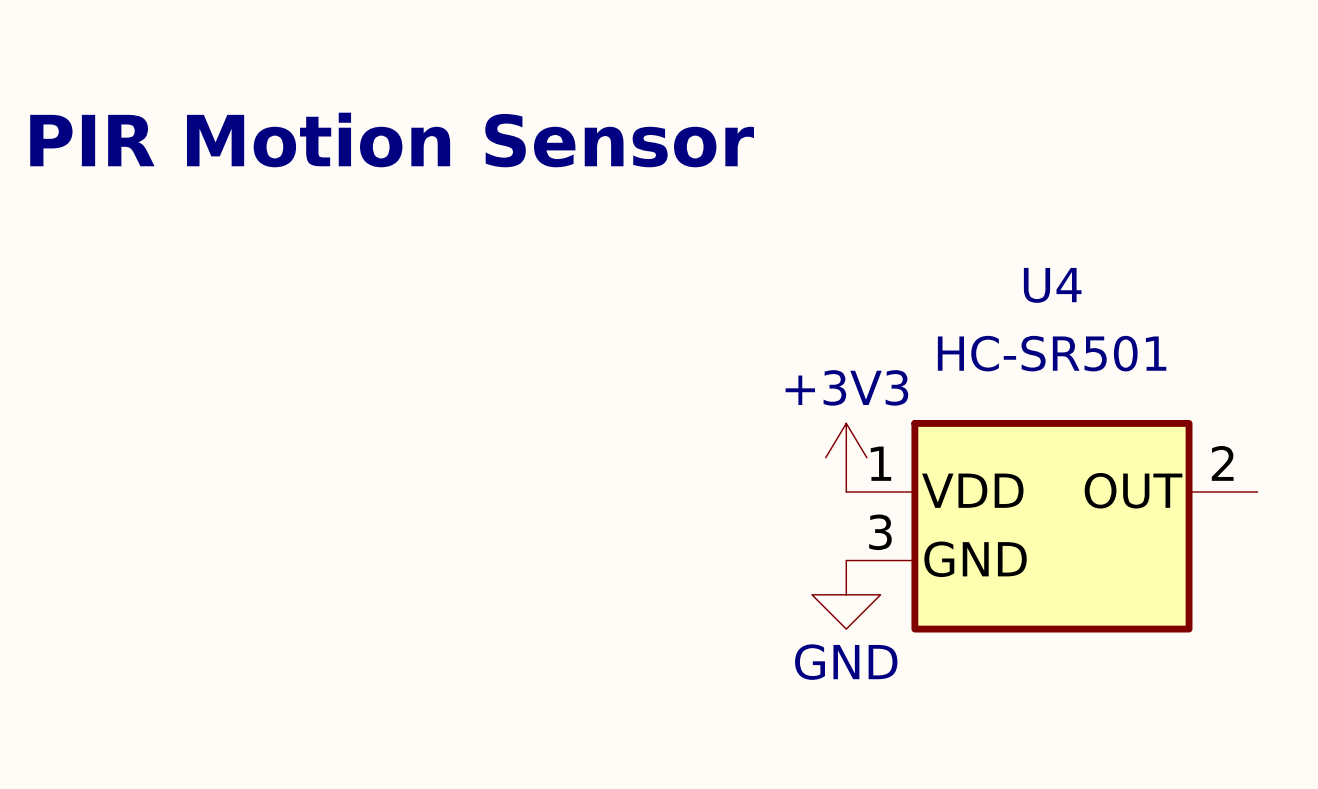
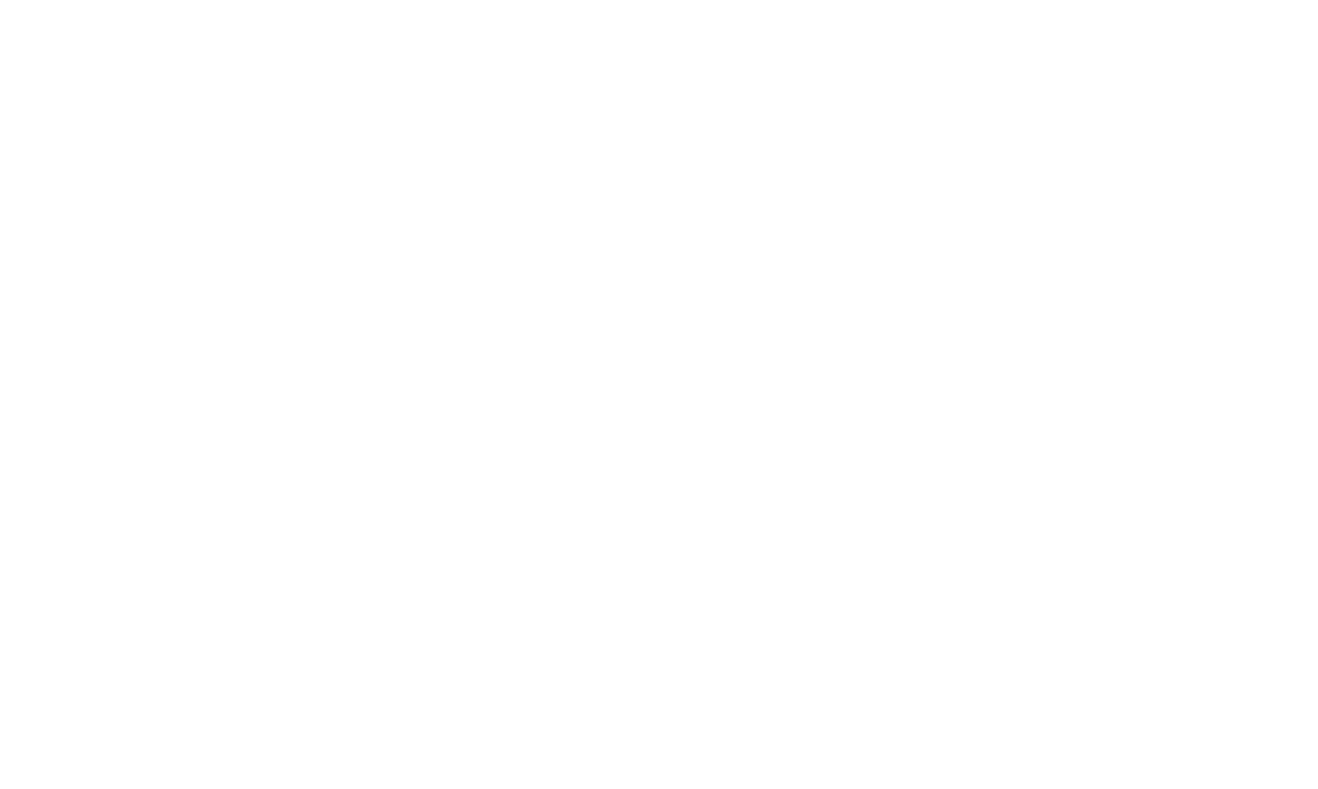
text: PIR Motion Sensor (392, 139) -> none
power symbol: +3V3 (846, 457) -> none
U4: HC-SR501 (1051, 526) -> none
power symbol: GND (846, 594) -> none

